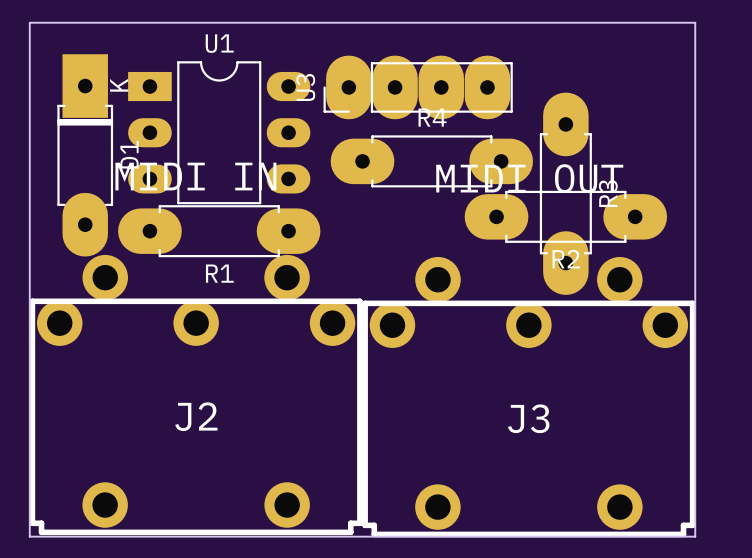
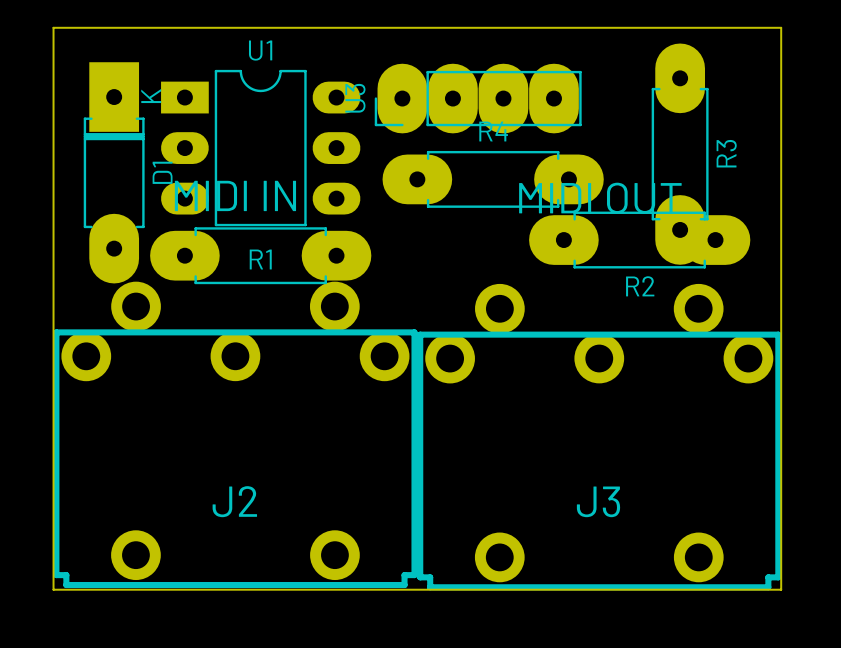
R3 position: (565, 193) -> (680, 154)
R1 name position: R1 (219, 273) -> R1 (260, 259)
J2 name position: J2 (196, 416) -> J2 (234, 501)
J3 name position: J3 (528, 418) -> J3 (598, 501)

